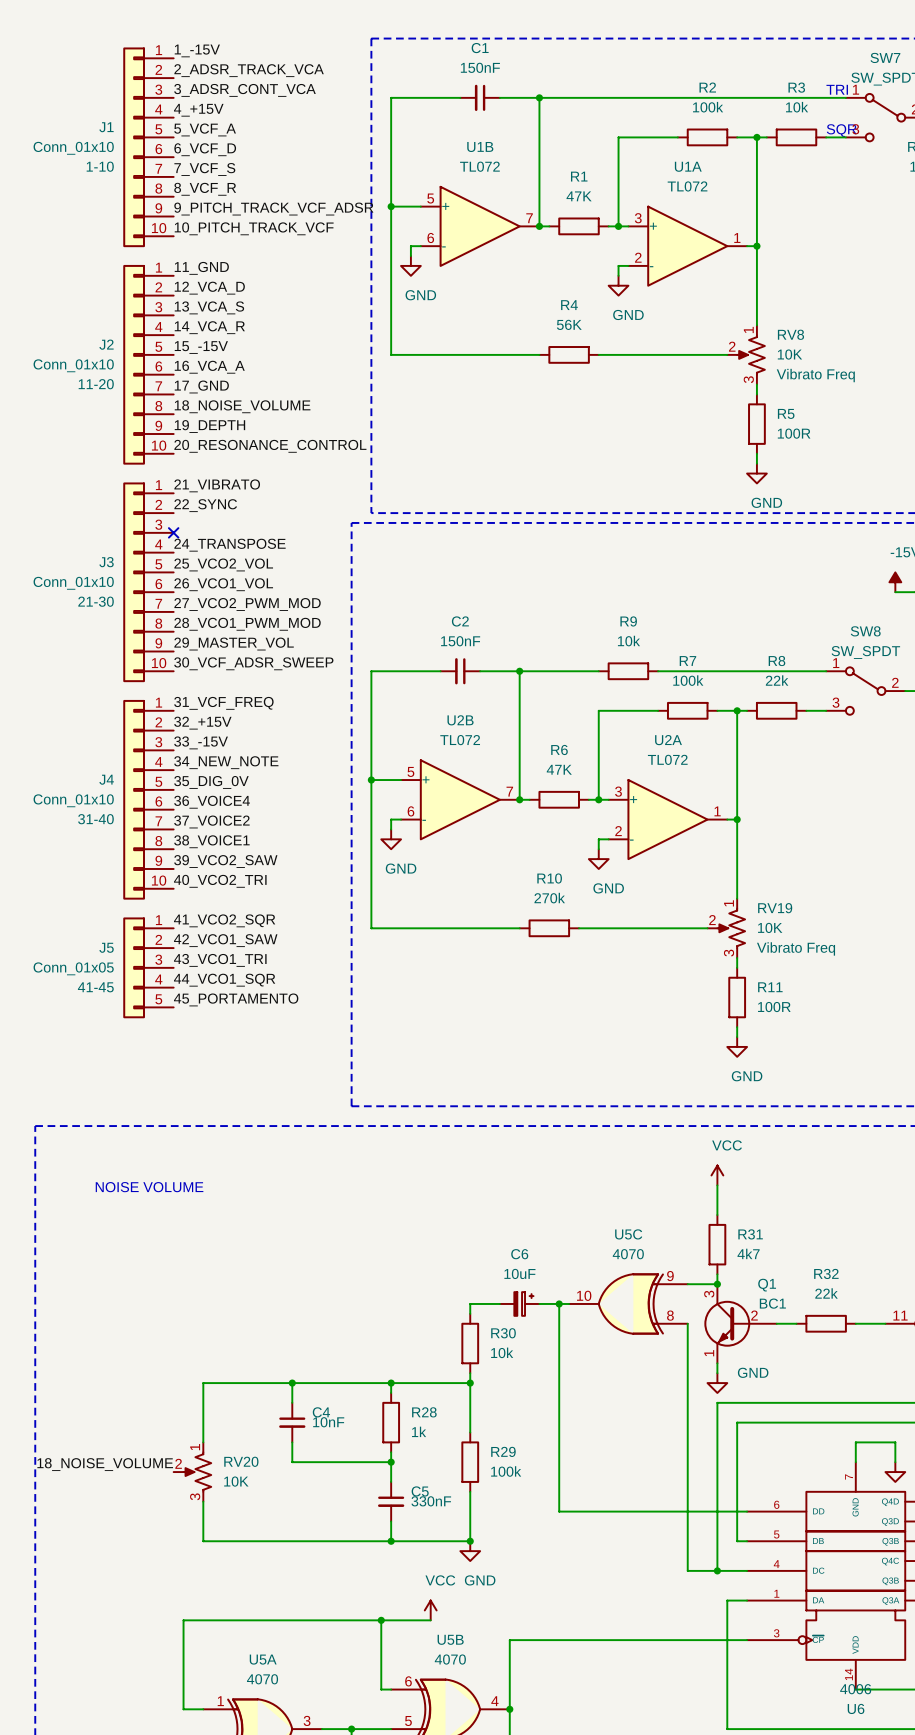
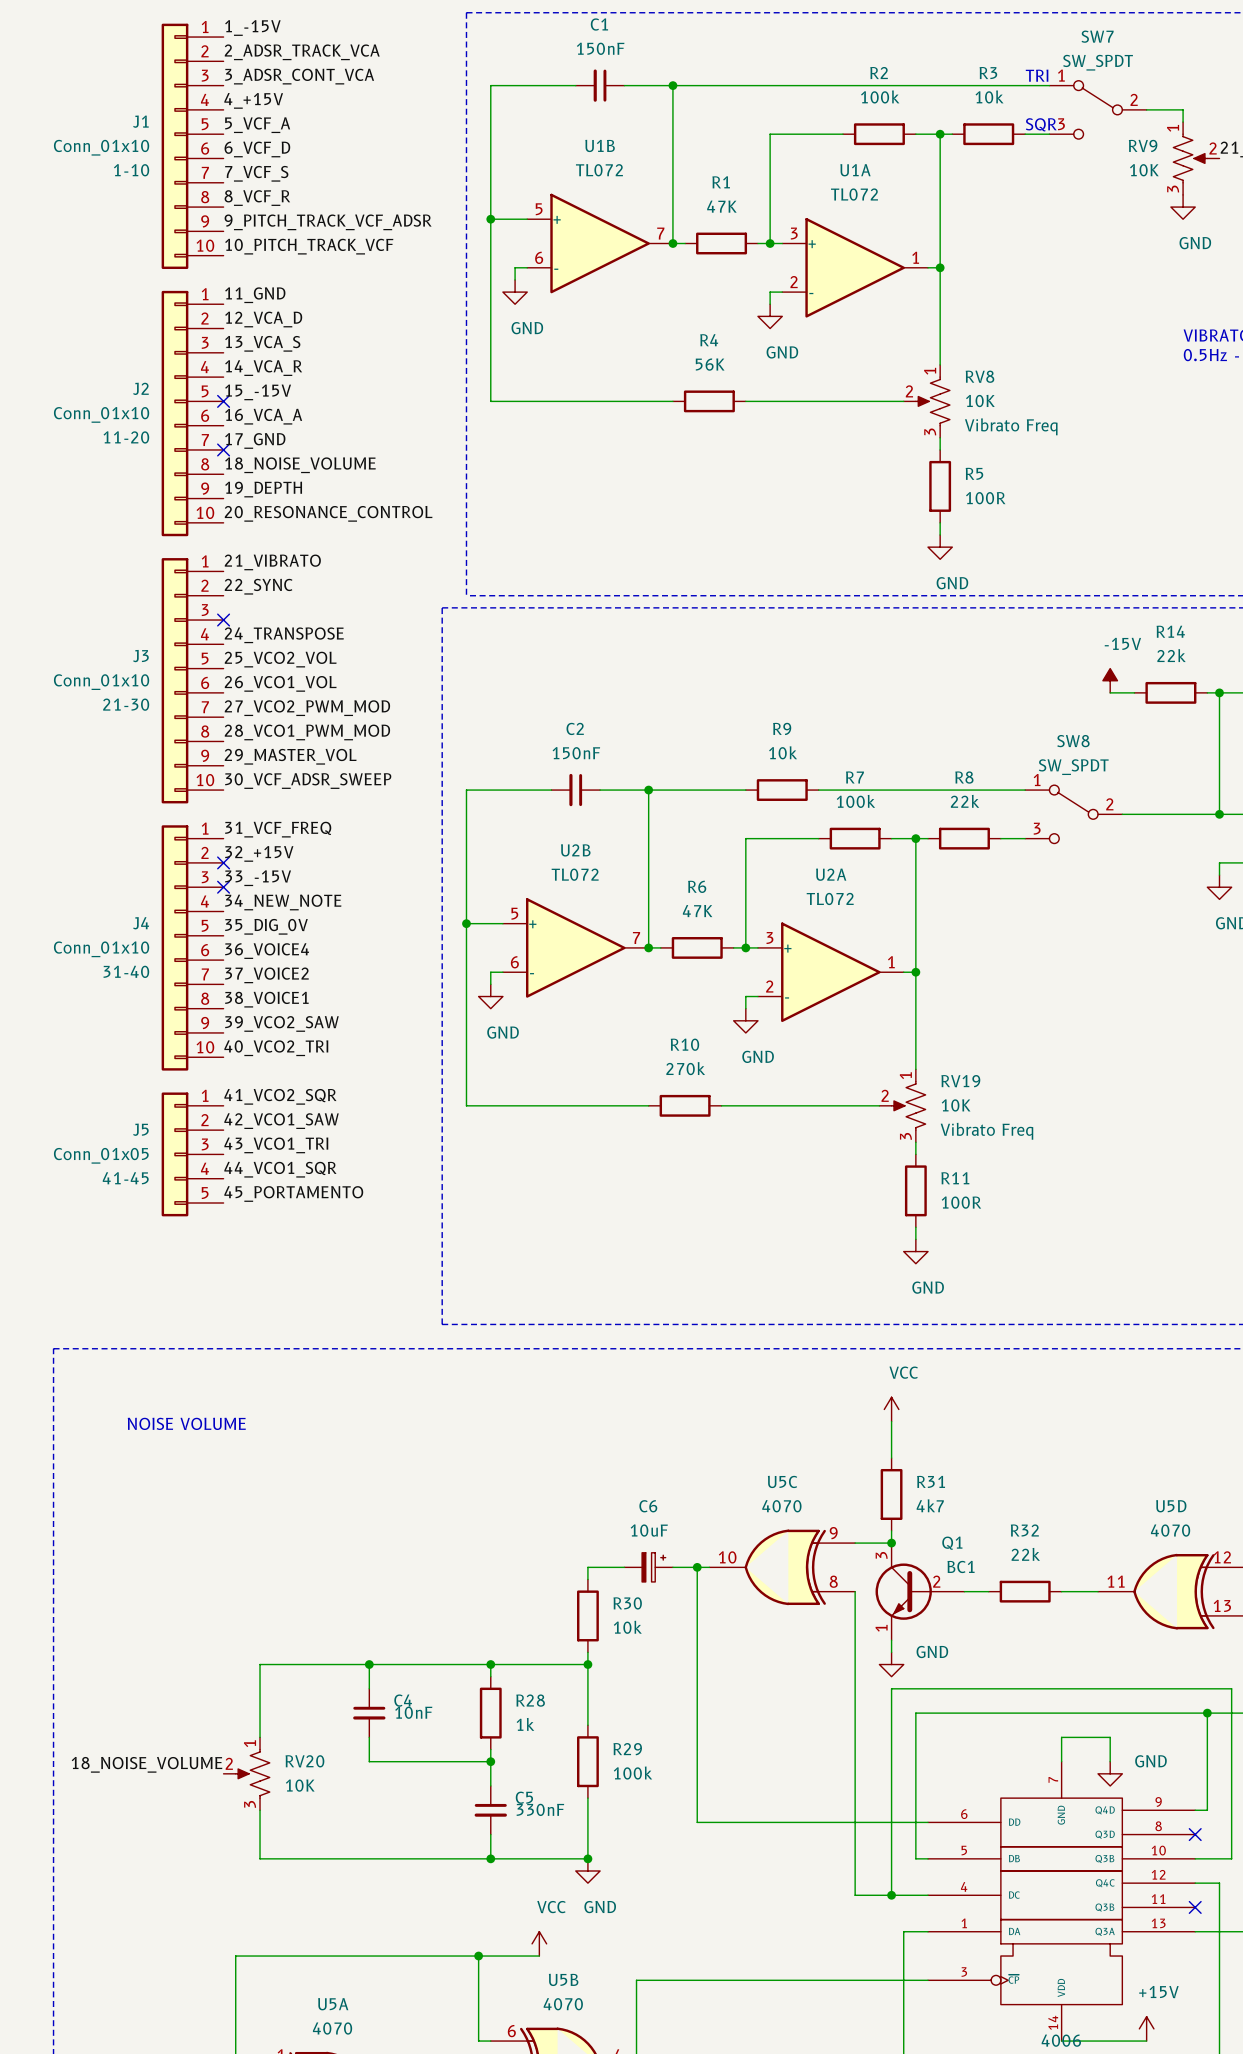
no-connect mark: none -> (223, 401)
no-connect mark: none -> (223, 449)
no-connect mark: none -> (223, 862)
no-connect mark: none -> (223, 887)

